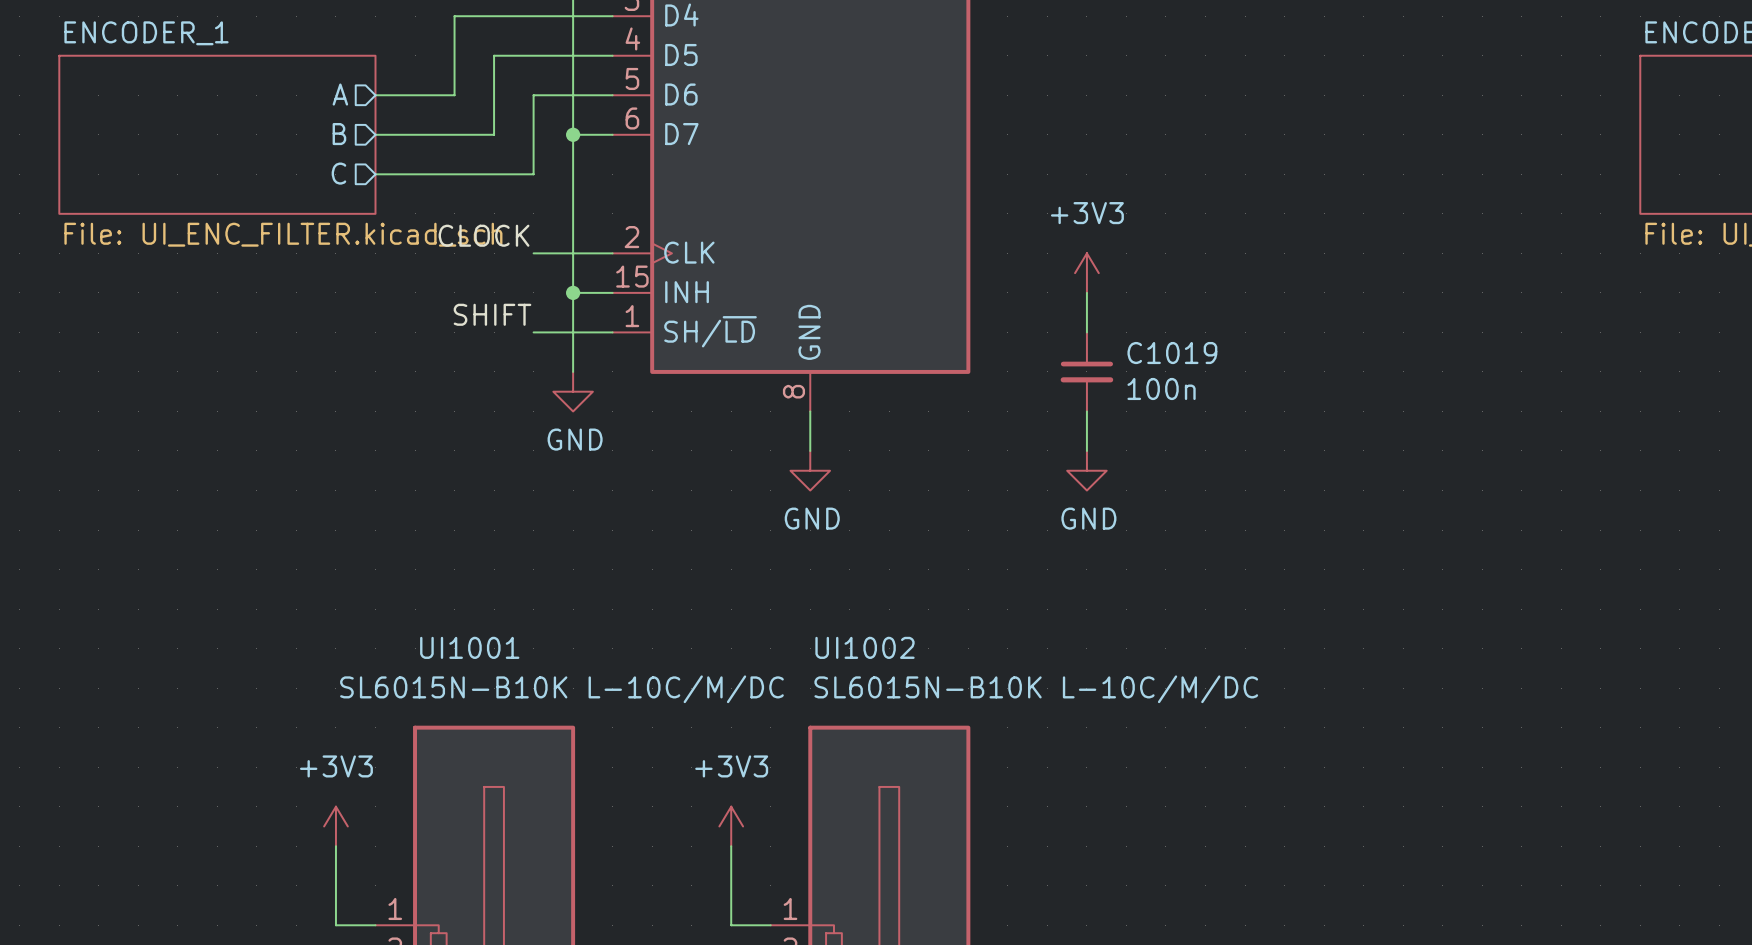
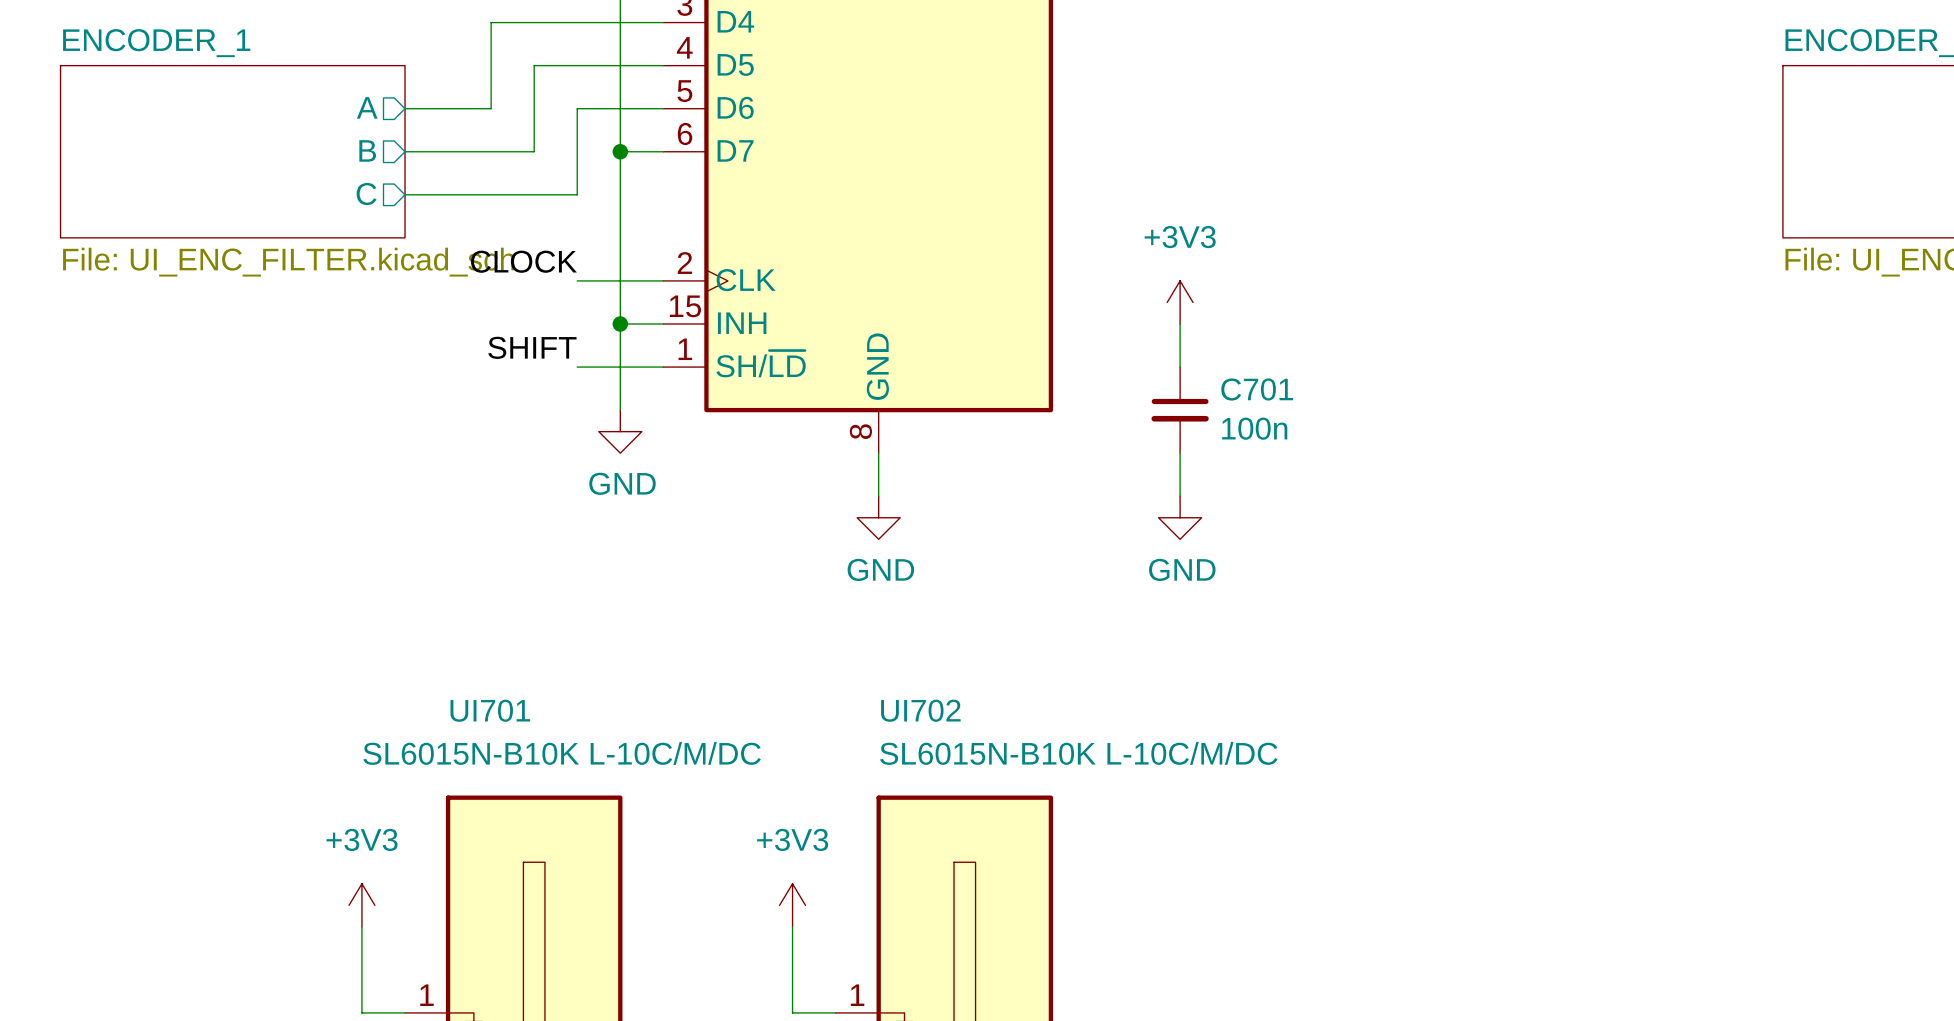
C1019 name: C1019 (1172, 353) -> C701 (1257, 389)
UI1001 name: UI1001 (469, 647) -> UI701 (490, 710)
UI1002 name: UI1002 (864, 647) -> UI702 (920, 710)

